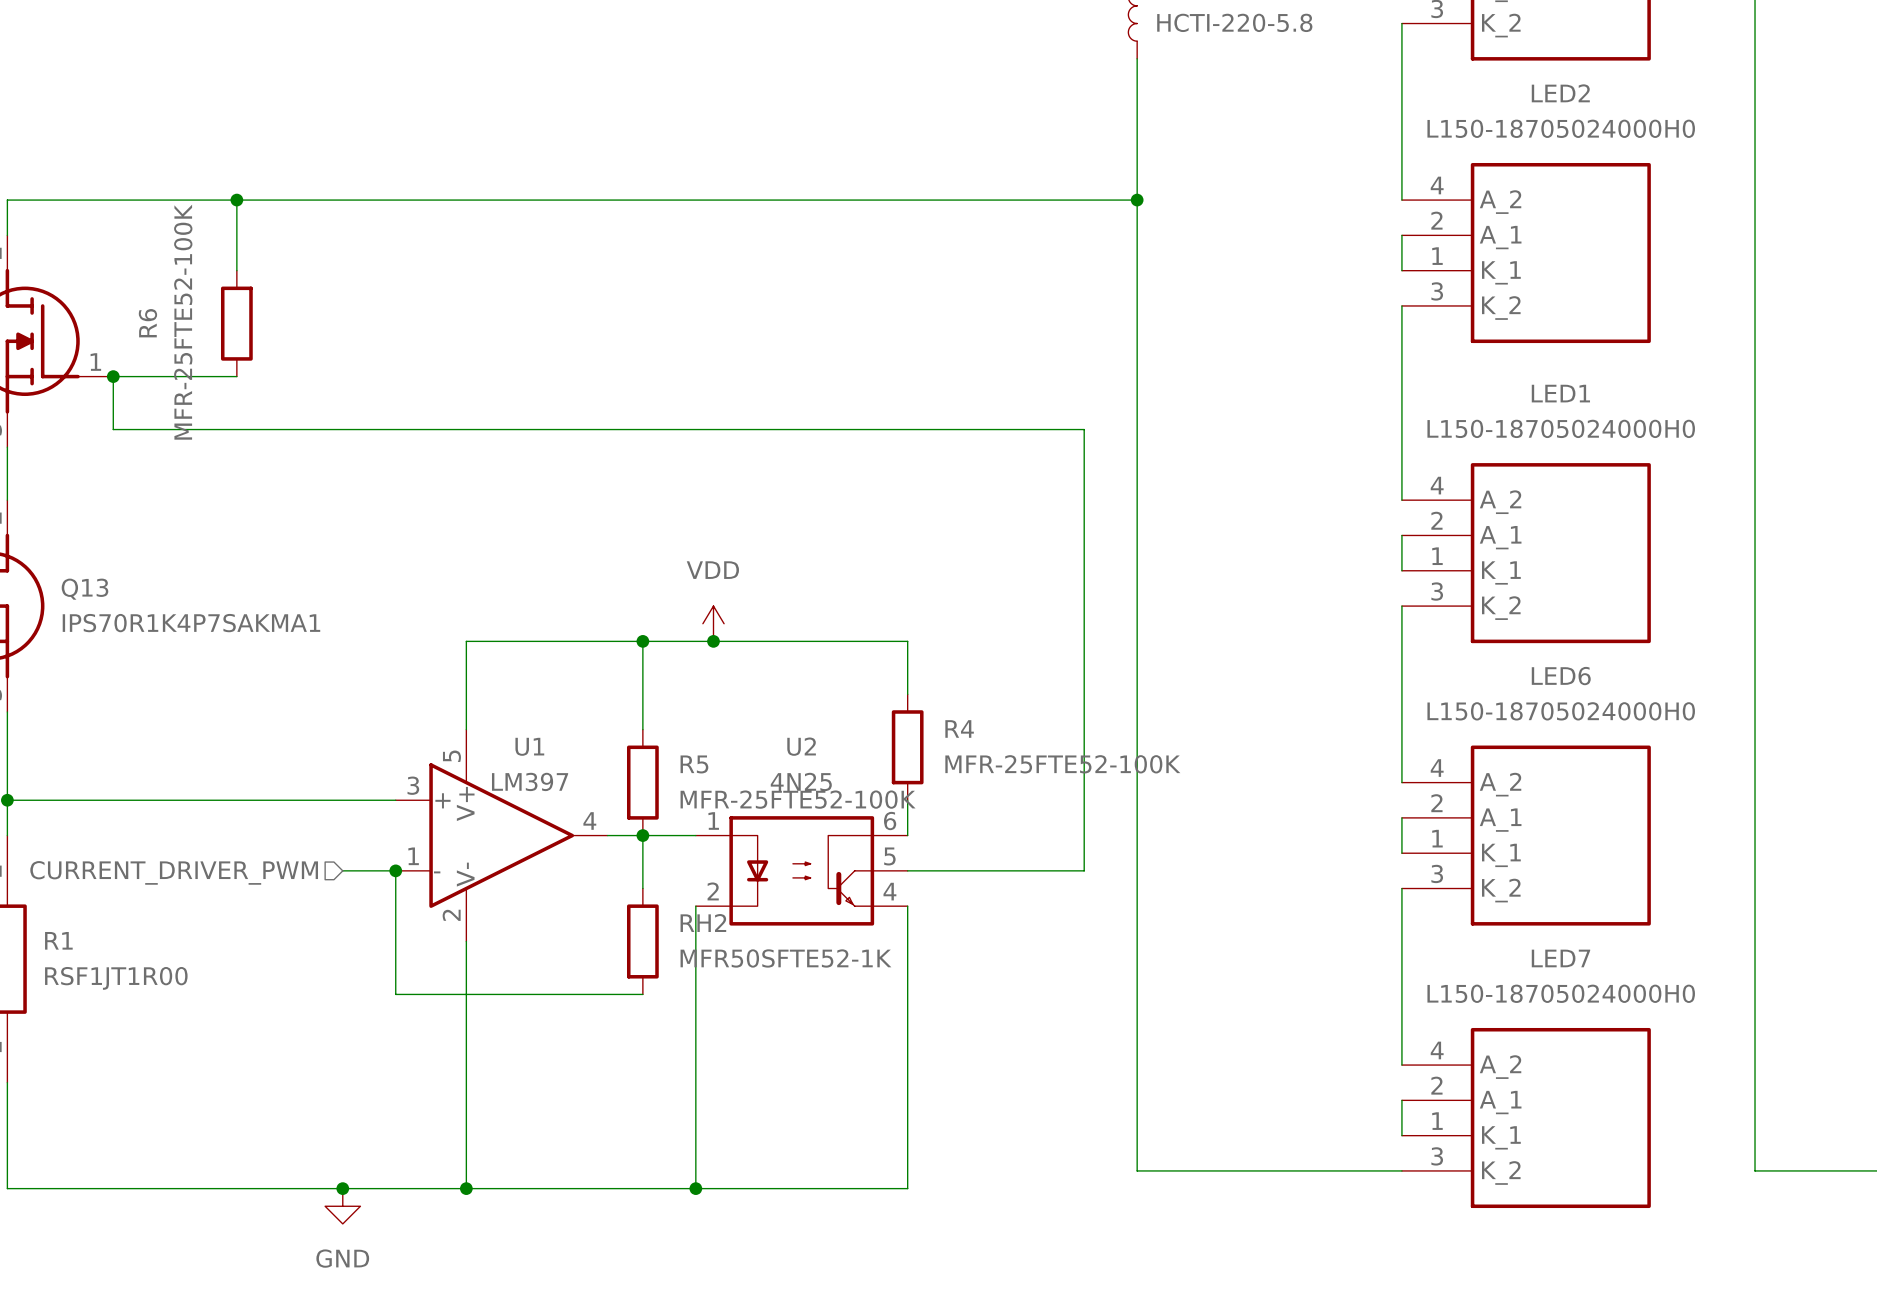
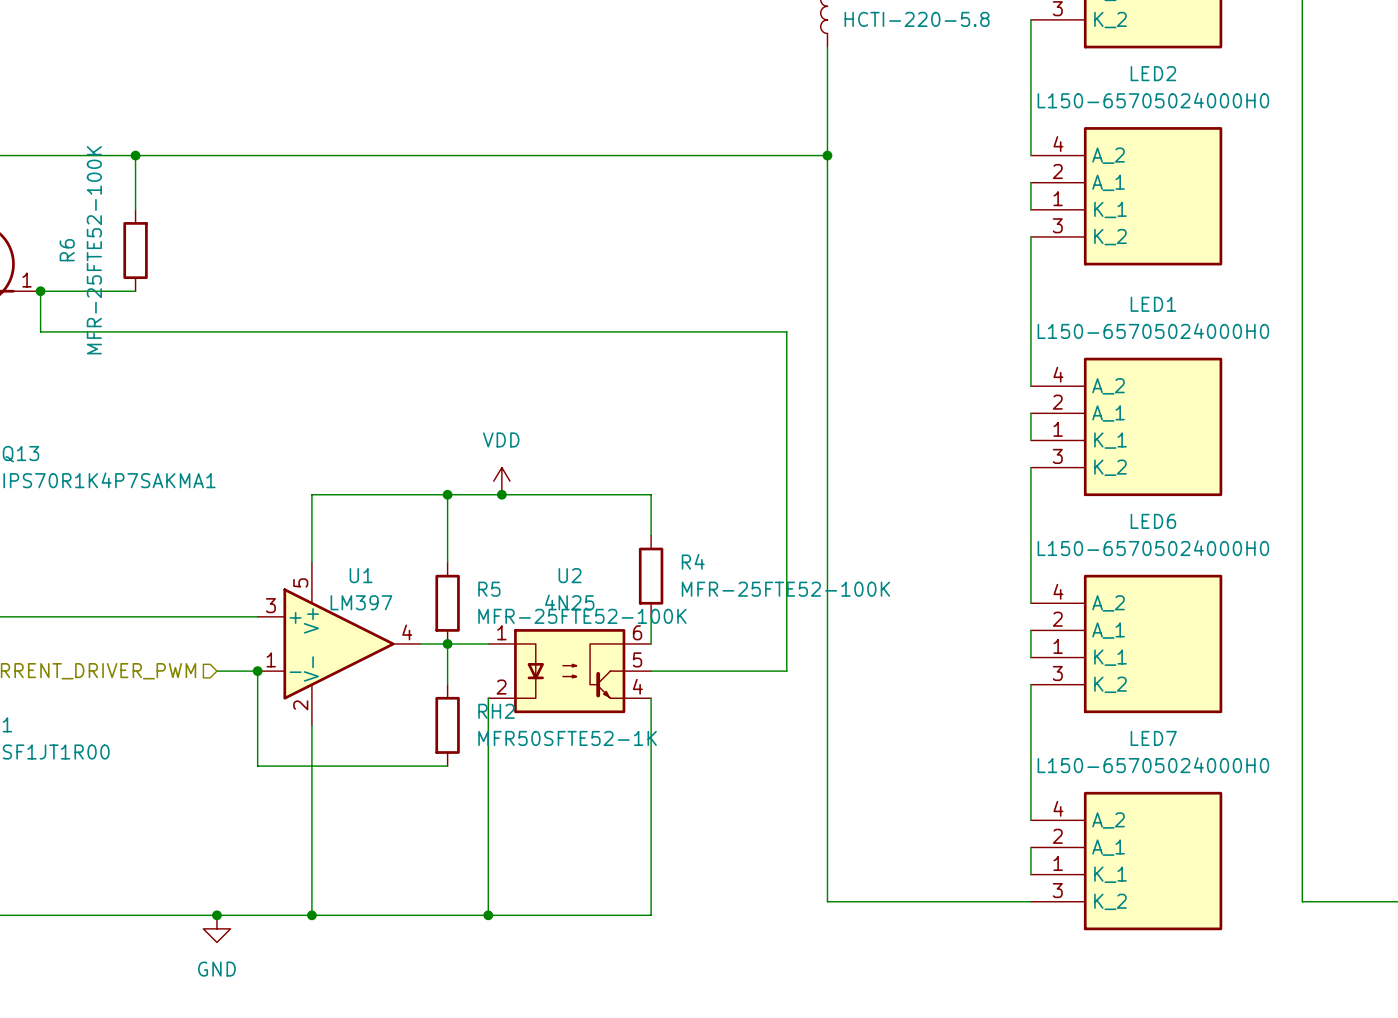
LED2 value: L150-18705024000H0 (1561, 128) -> L150-65705024000H0 (1153, 100)
LED1 value: L150-18705024000H0 (1561, 428) -> L150-65705024000H0 (1153, 331)
LED6 value: L150-18705024000H0 (1561, 711) -> L150-65705024000H0 (1153, 548)
LED7 value: L150-18705024000H0 (1561, 993) -> L150-65705024000H0 (1153, 765)

